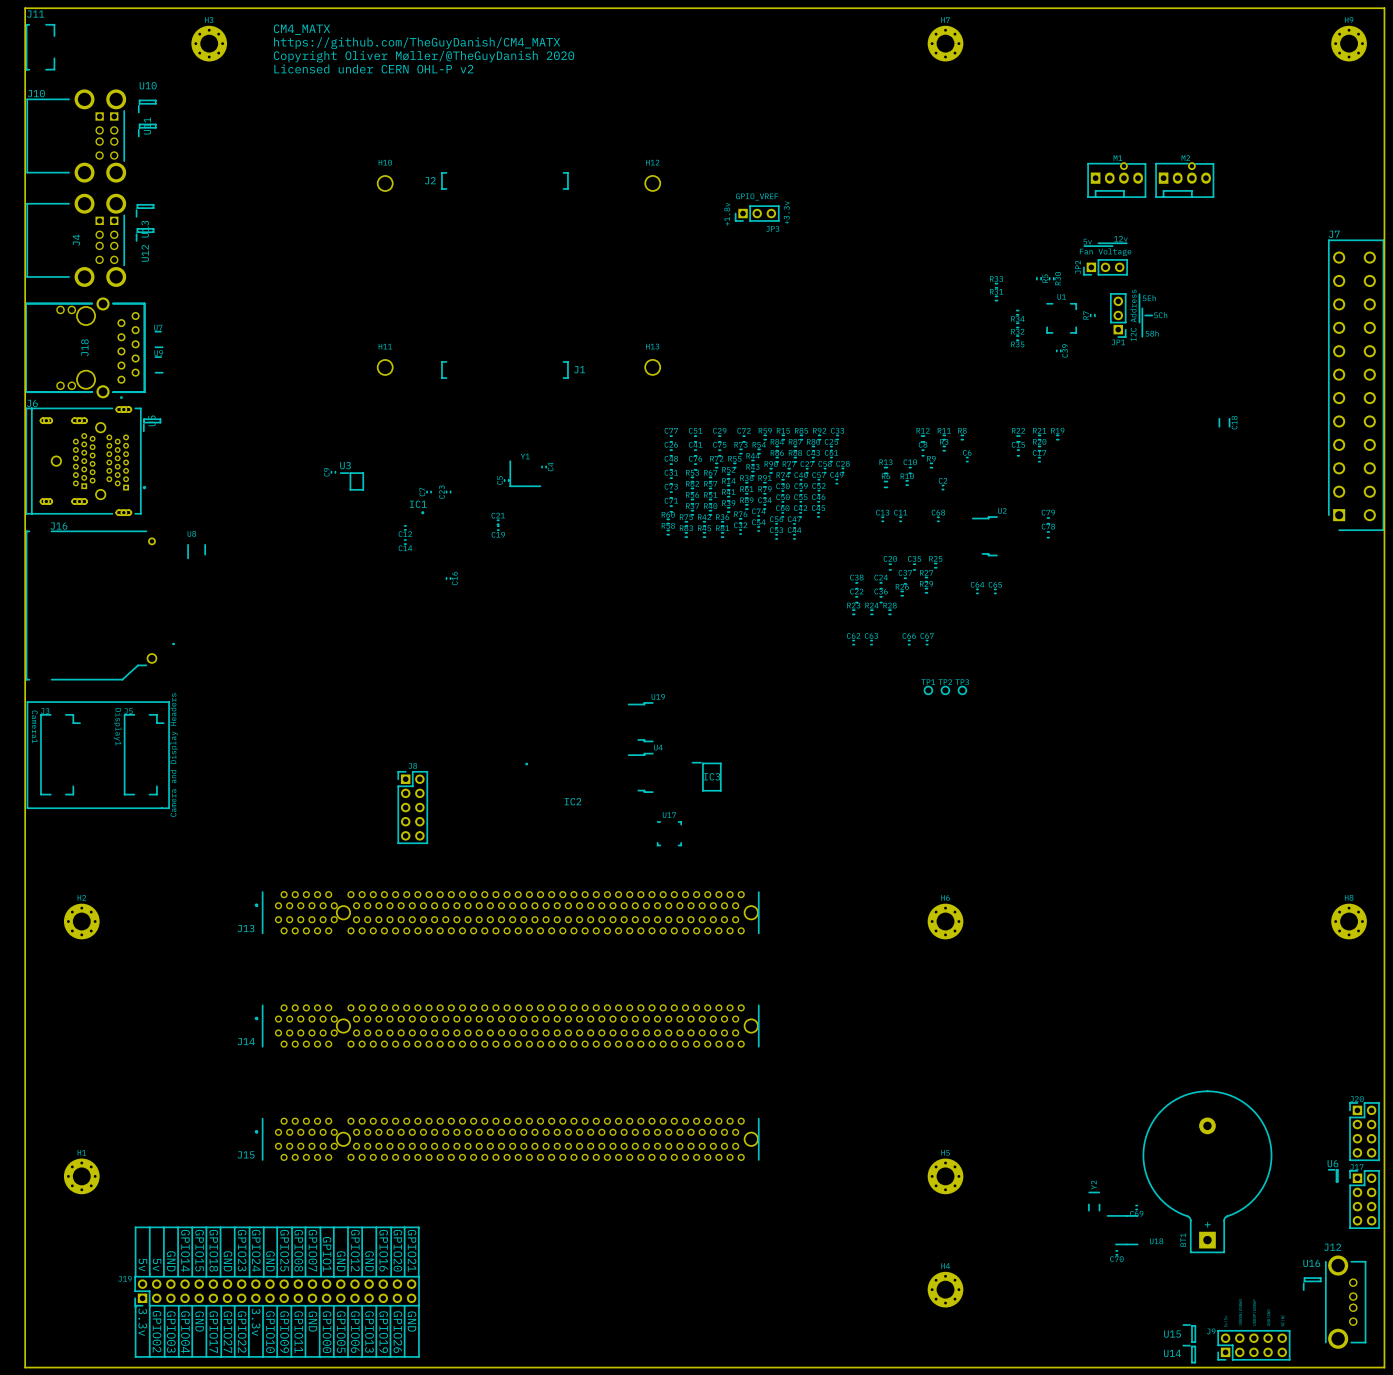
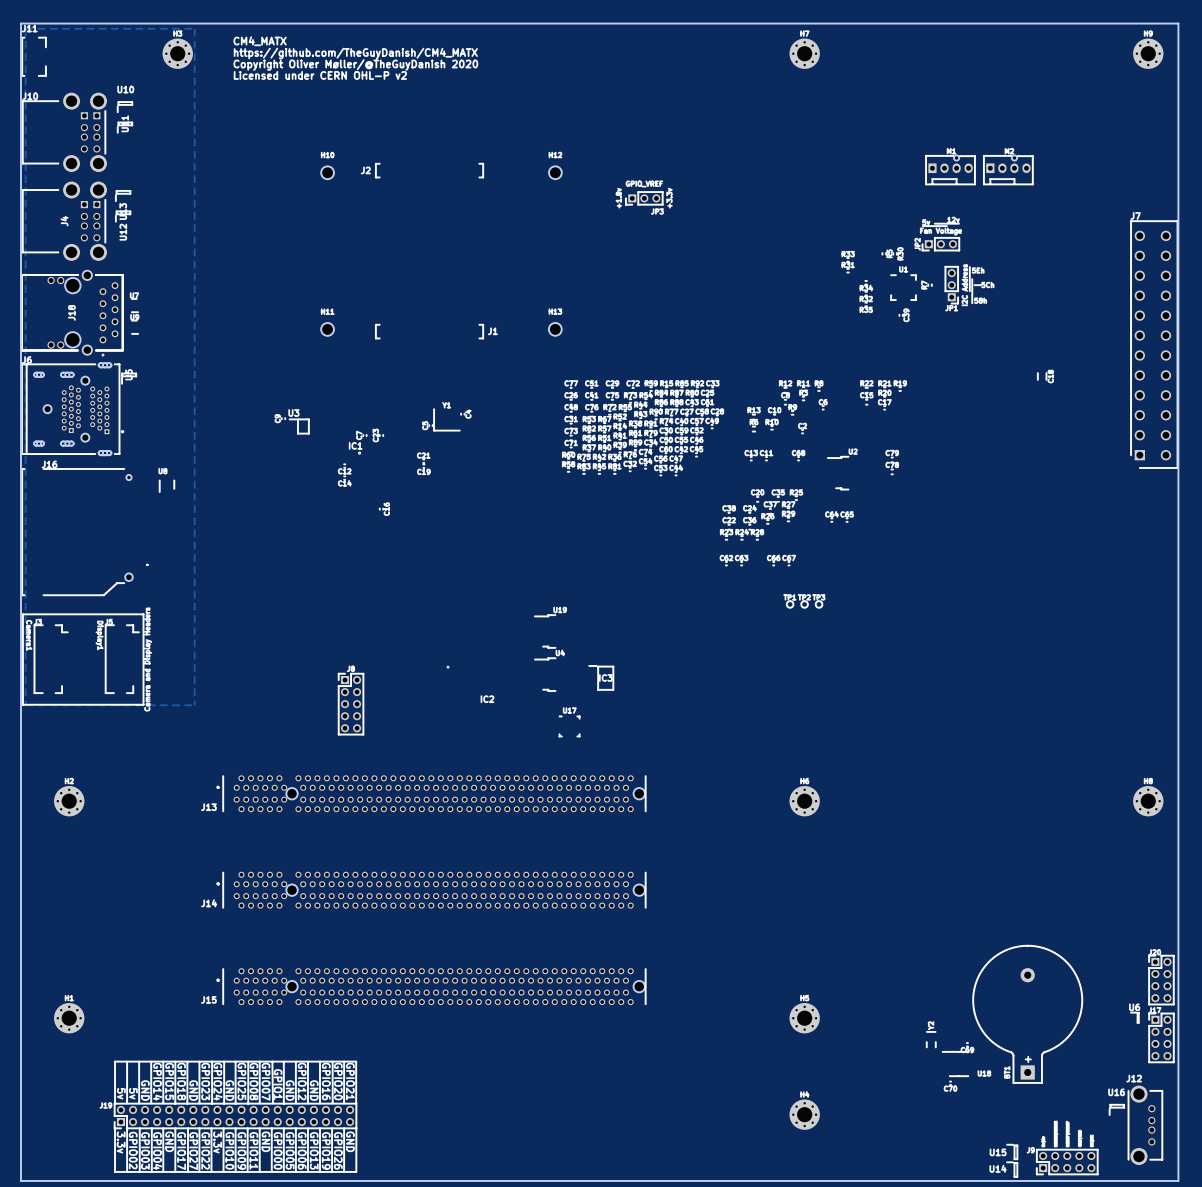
zone outline: none -> (25, 28) (25, 705) (194, 705) (194, 28) (25, 28)

